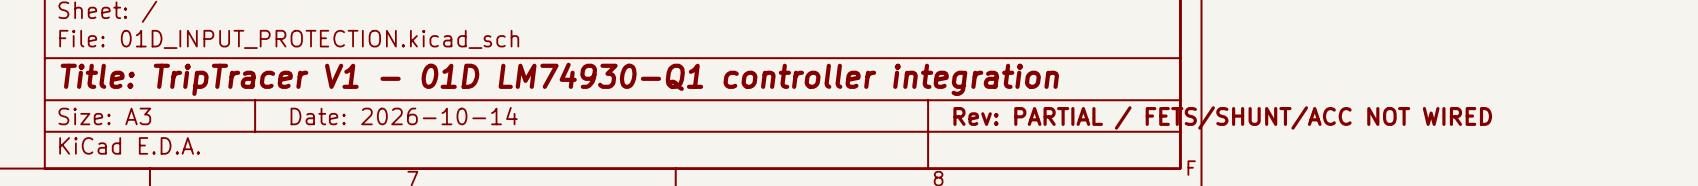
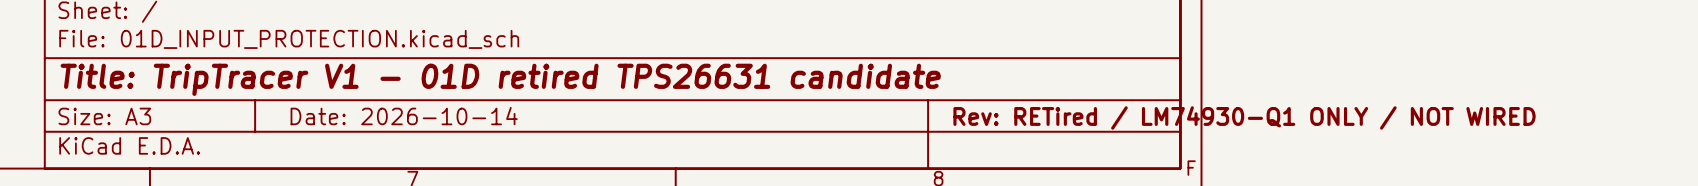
title block: Title: TripTracer V1 - 01D LM74930-Q1 controller integration (559, 79) -> Title: TripTracer V1 - 01D retired TPS26631 candidate (500, 79)
title block: Rev: PARTIAL / FETS/SHUNT/ACC NOT WIRED (1222, 117) -> Rev: RETired / LM74930-Q1 ONLY / NOT WIRED (1244, 117)

